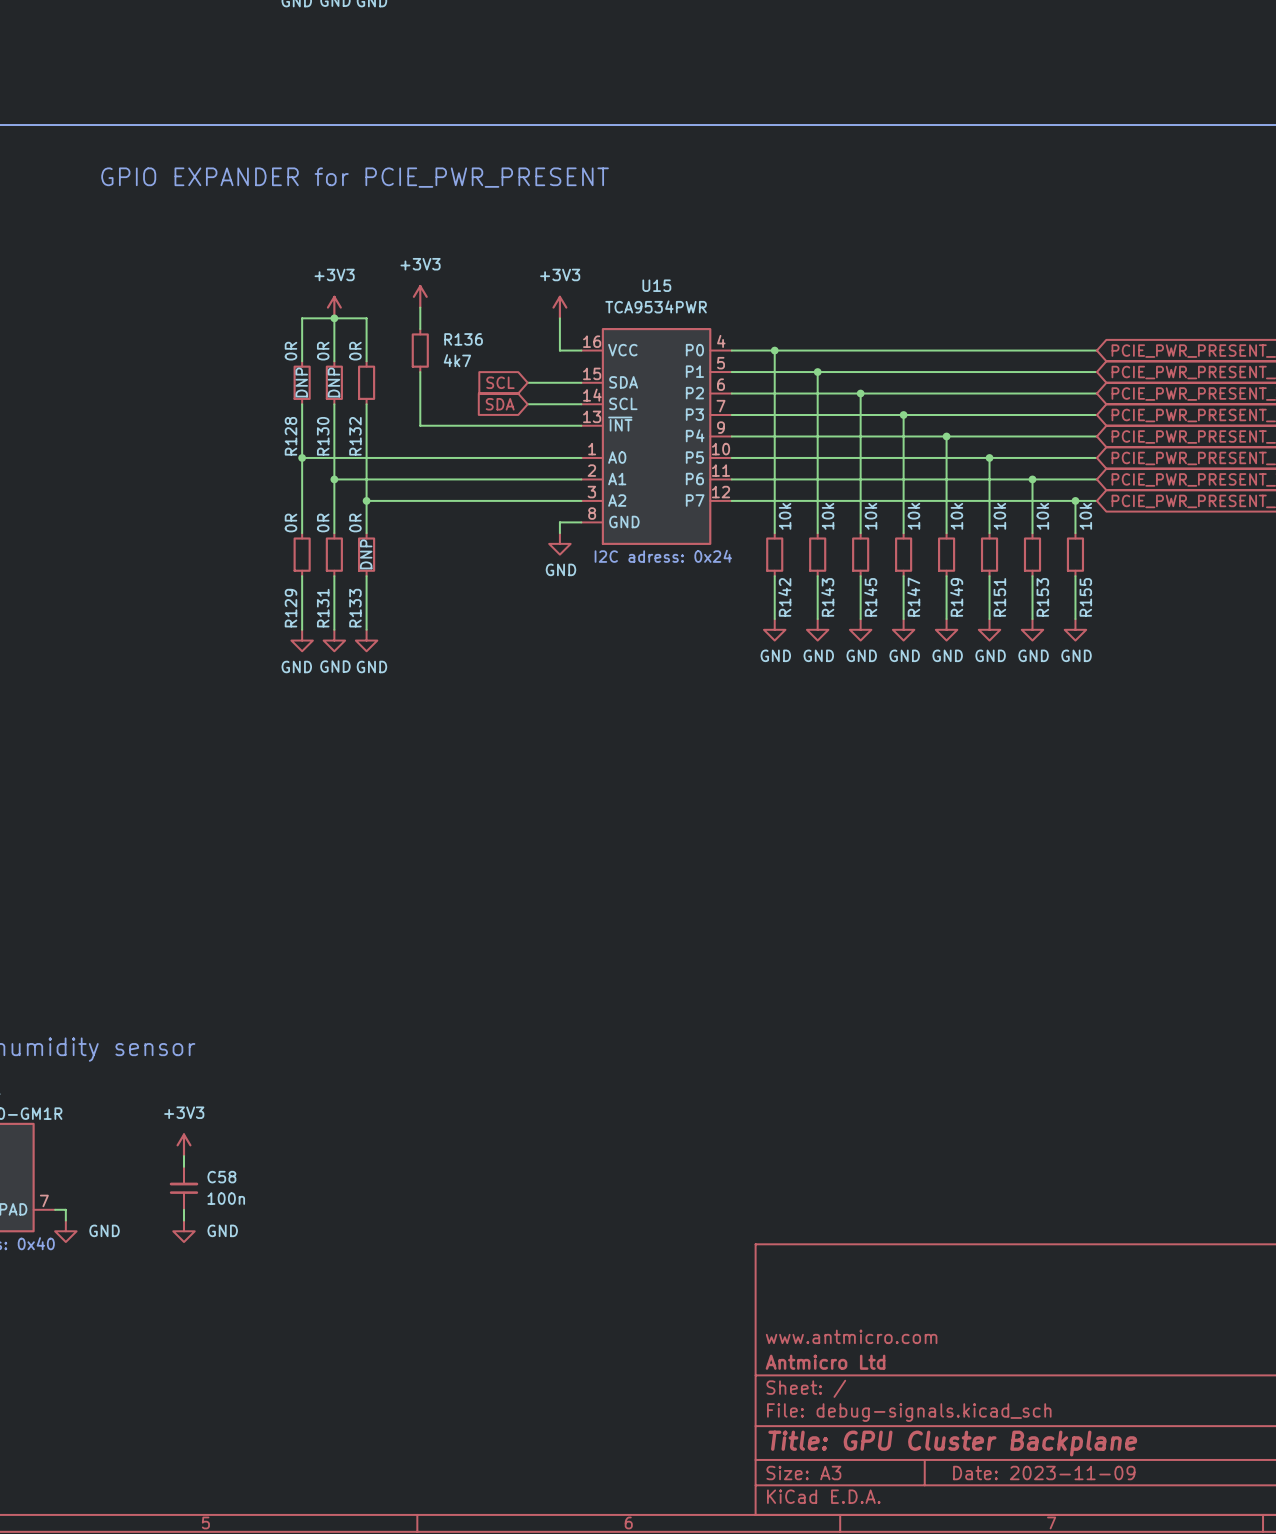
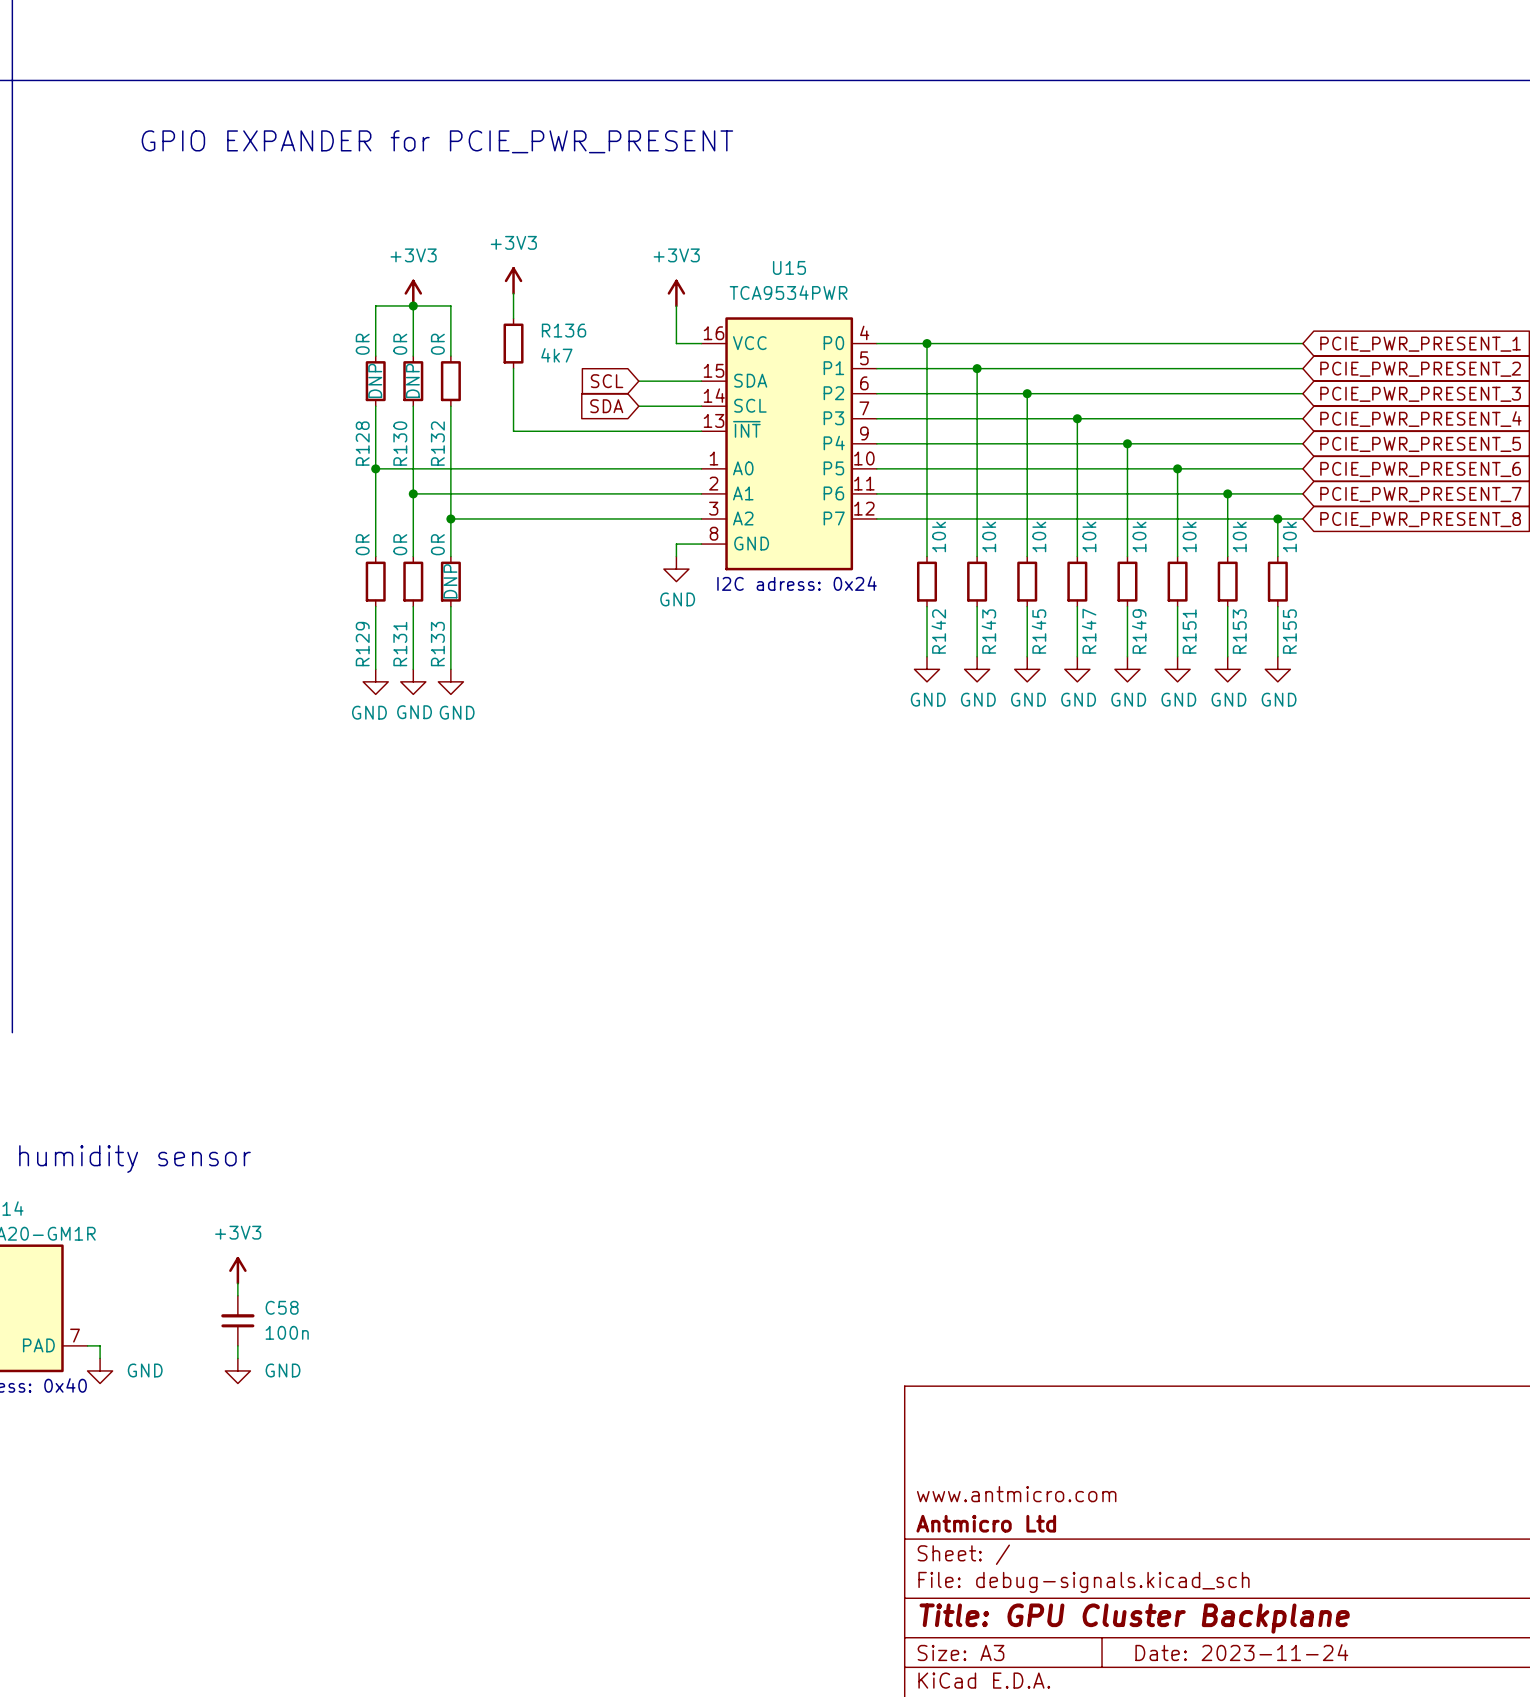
title block: Date: 2023-11-09 (1044, 1473) -> Date: 2023-11-24 (1241, 1652)

